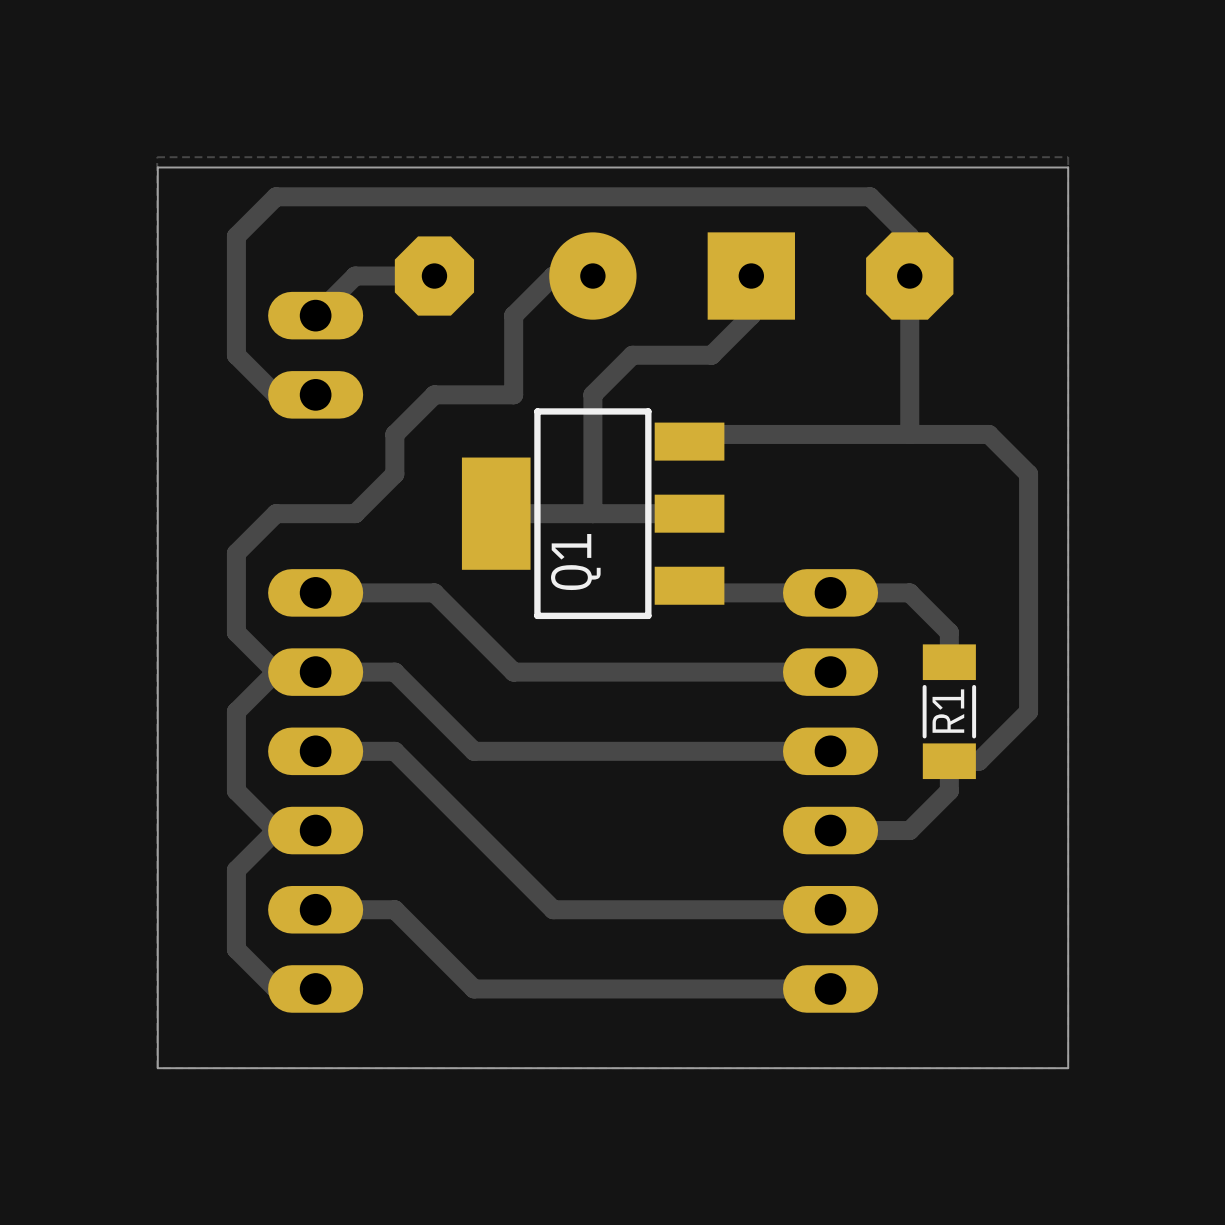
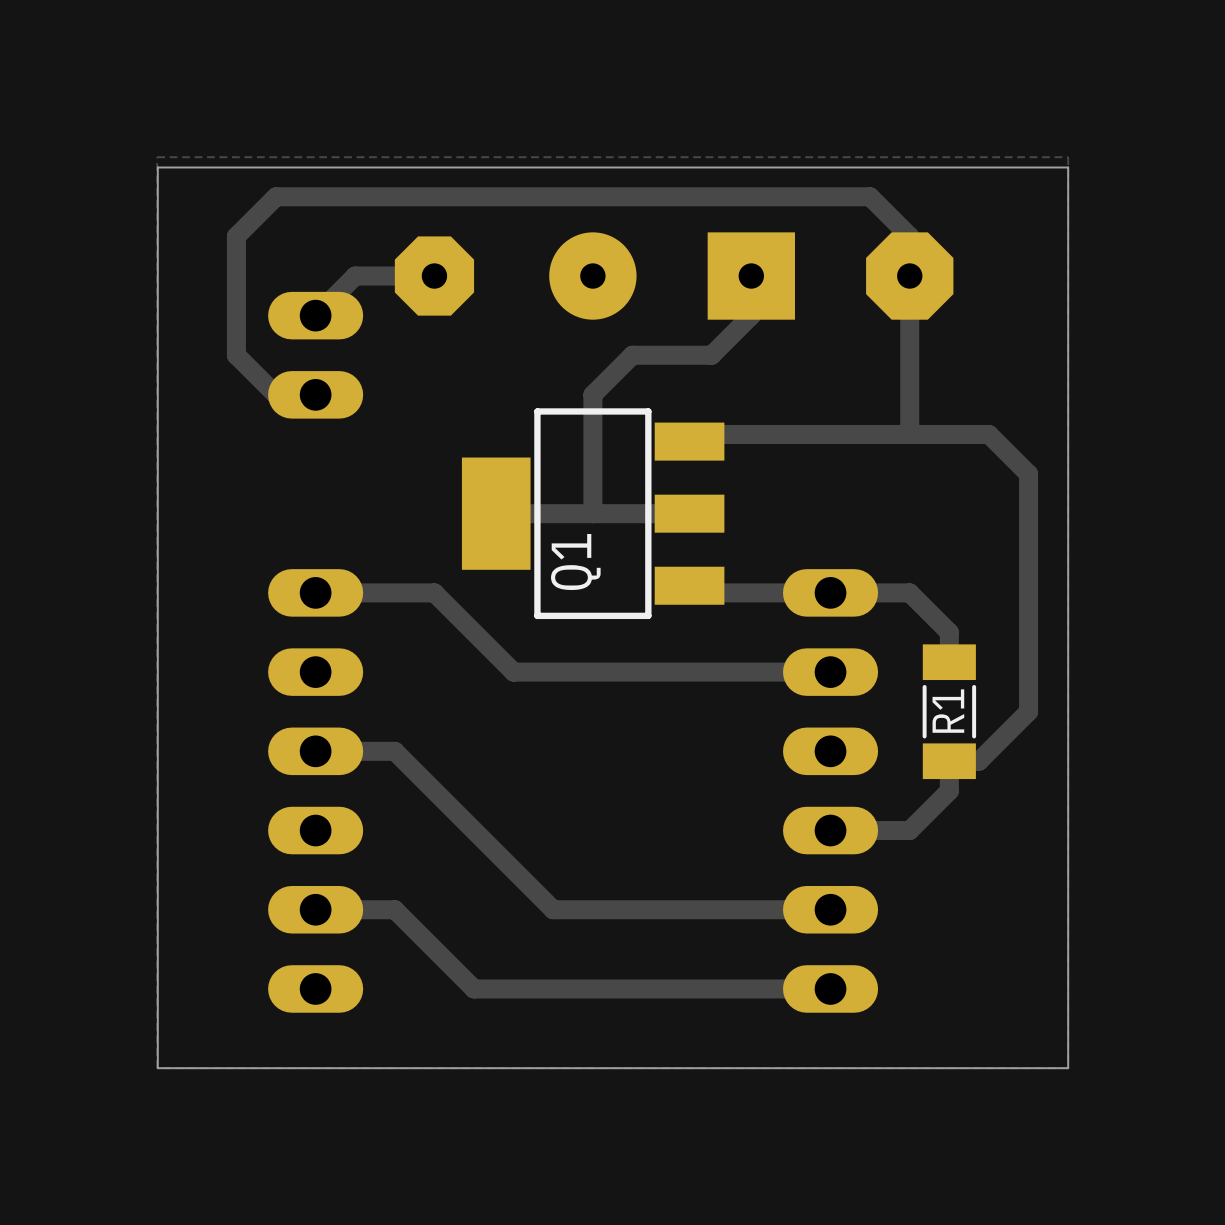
track: (592, 276) (553, 276) (513, 315) (513, 394) (434, 394) (394, 434) (394, 474) (355, 513) (276, 513) (236, 553) (236, 632) (276, 672) -> none
track: (276, 672) (394, 672) (474, 751) (830, 751) -> none
track: (276, 672) (236, 711) (236, 790) (276, 830) -> none
track: (276, 830) (236, 870) (236, 949) (276, 988) (315, 988) -> none

